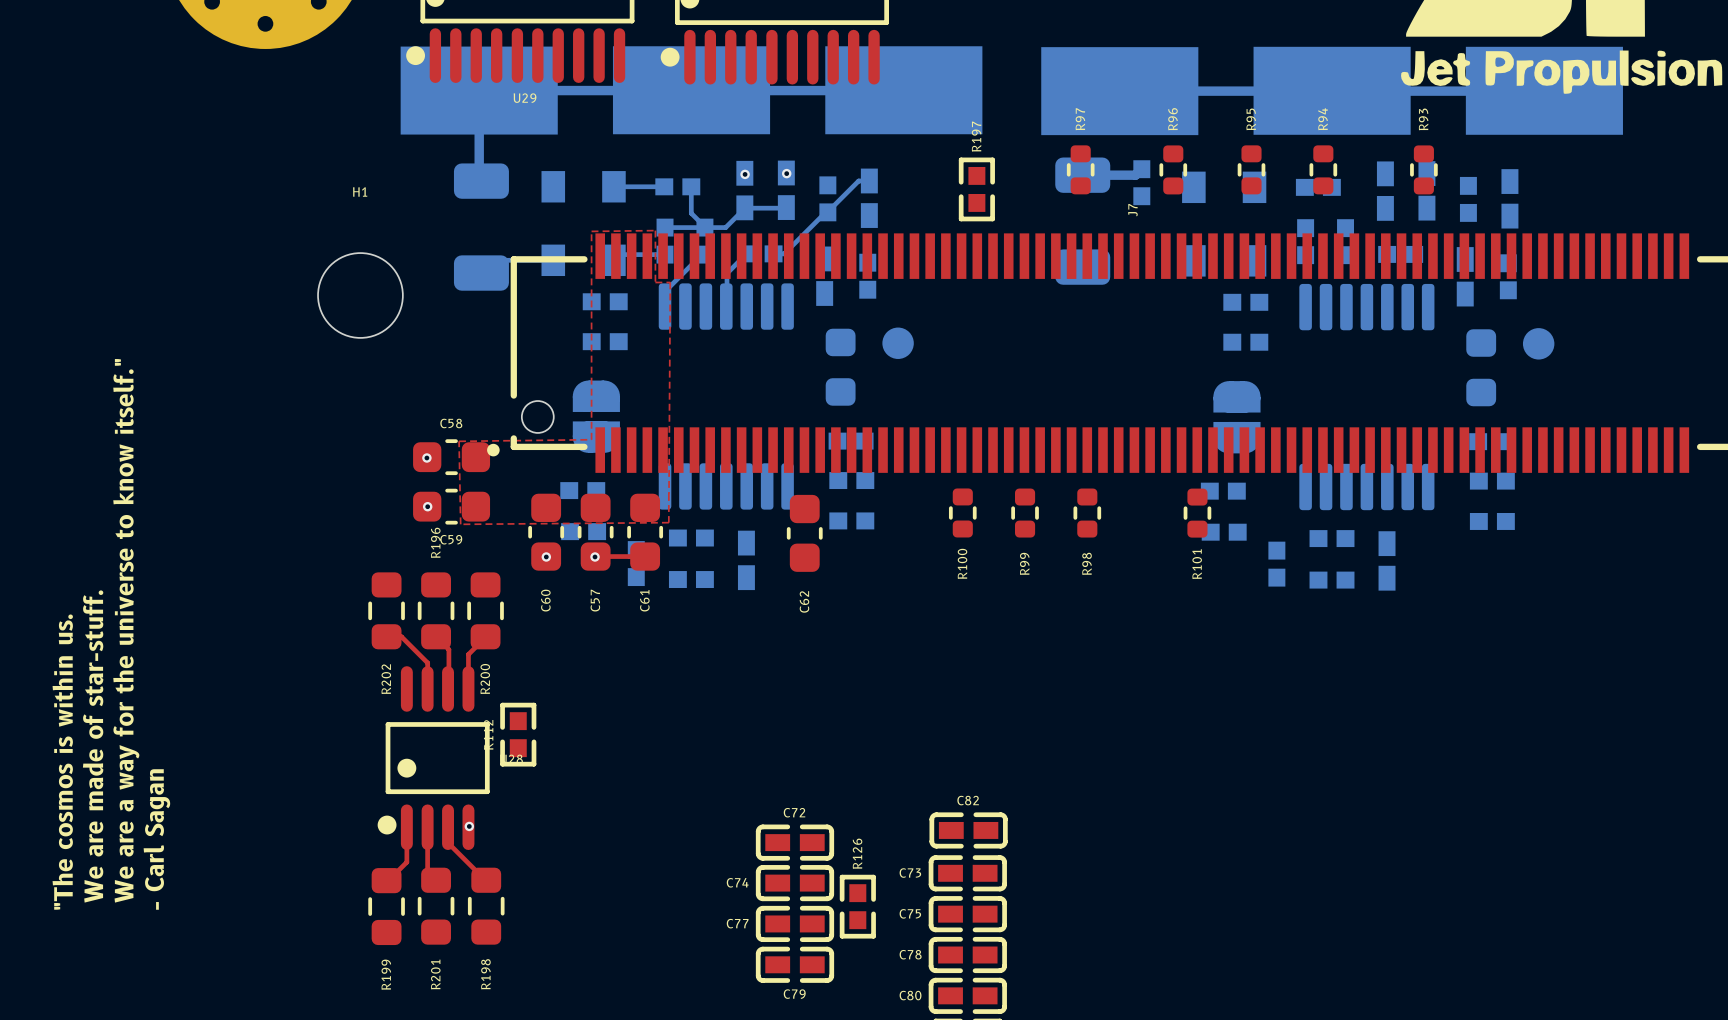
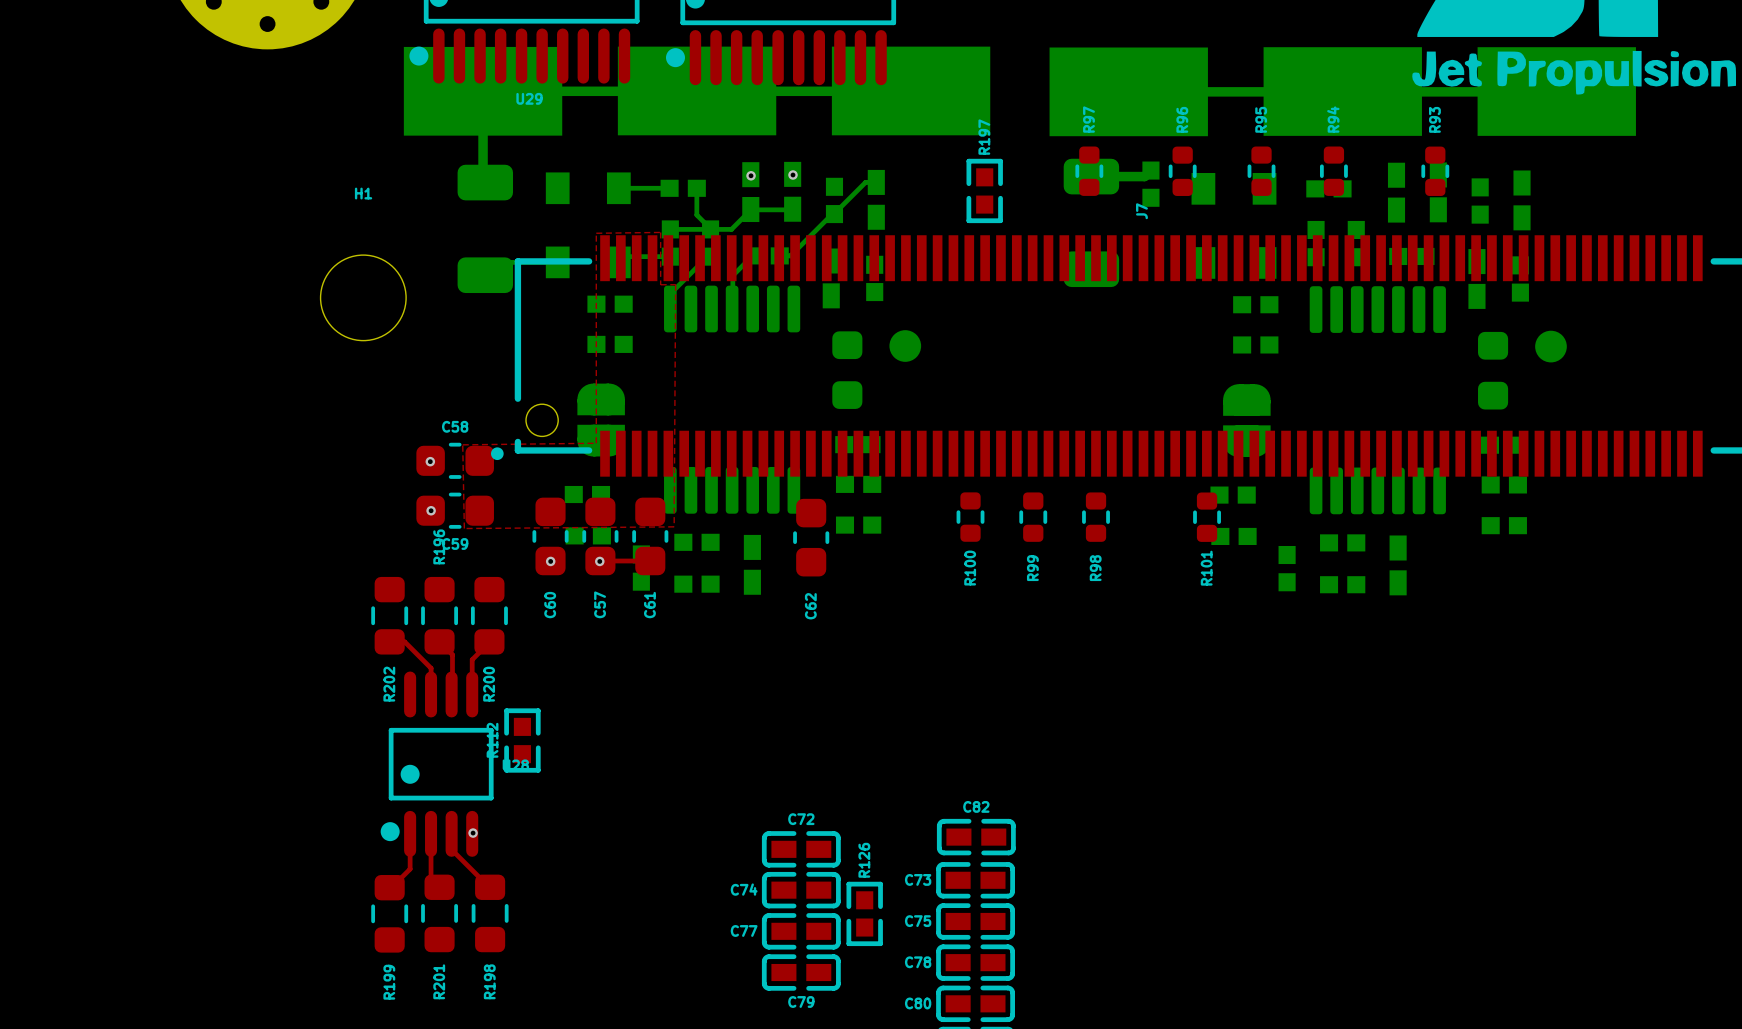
text: We are a way for the universe to know itself." (126, 630) -> none
text: We are made of star-stuff. (93, 746) -> none
text: "The cosmos is within us. (62, 762) -> none
text: - Carl Sagan (156, 839) -> none

